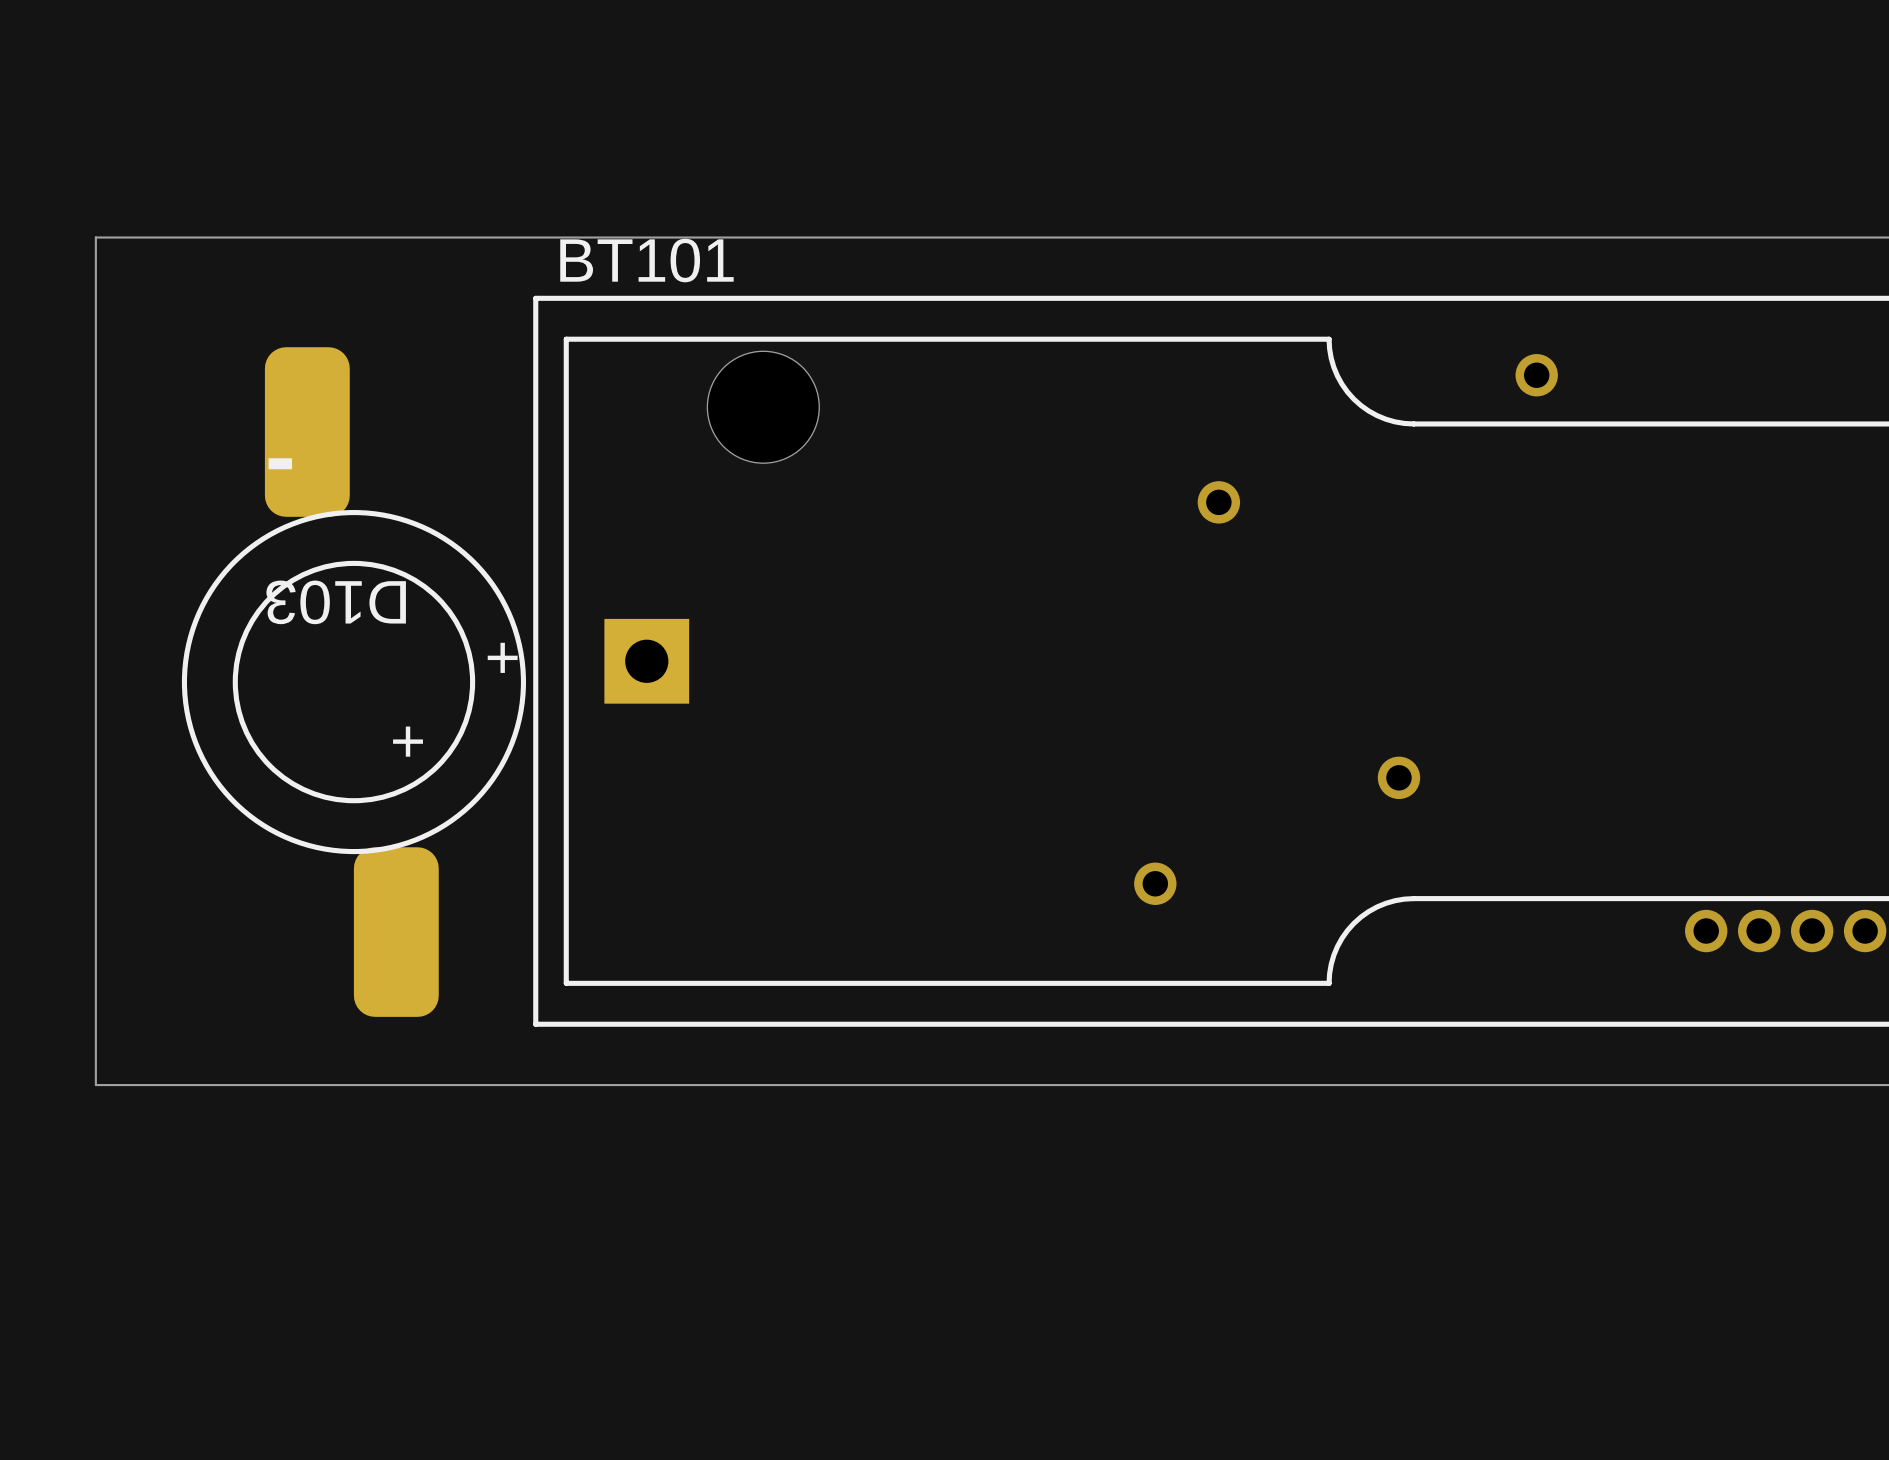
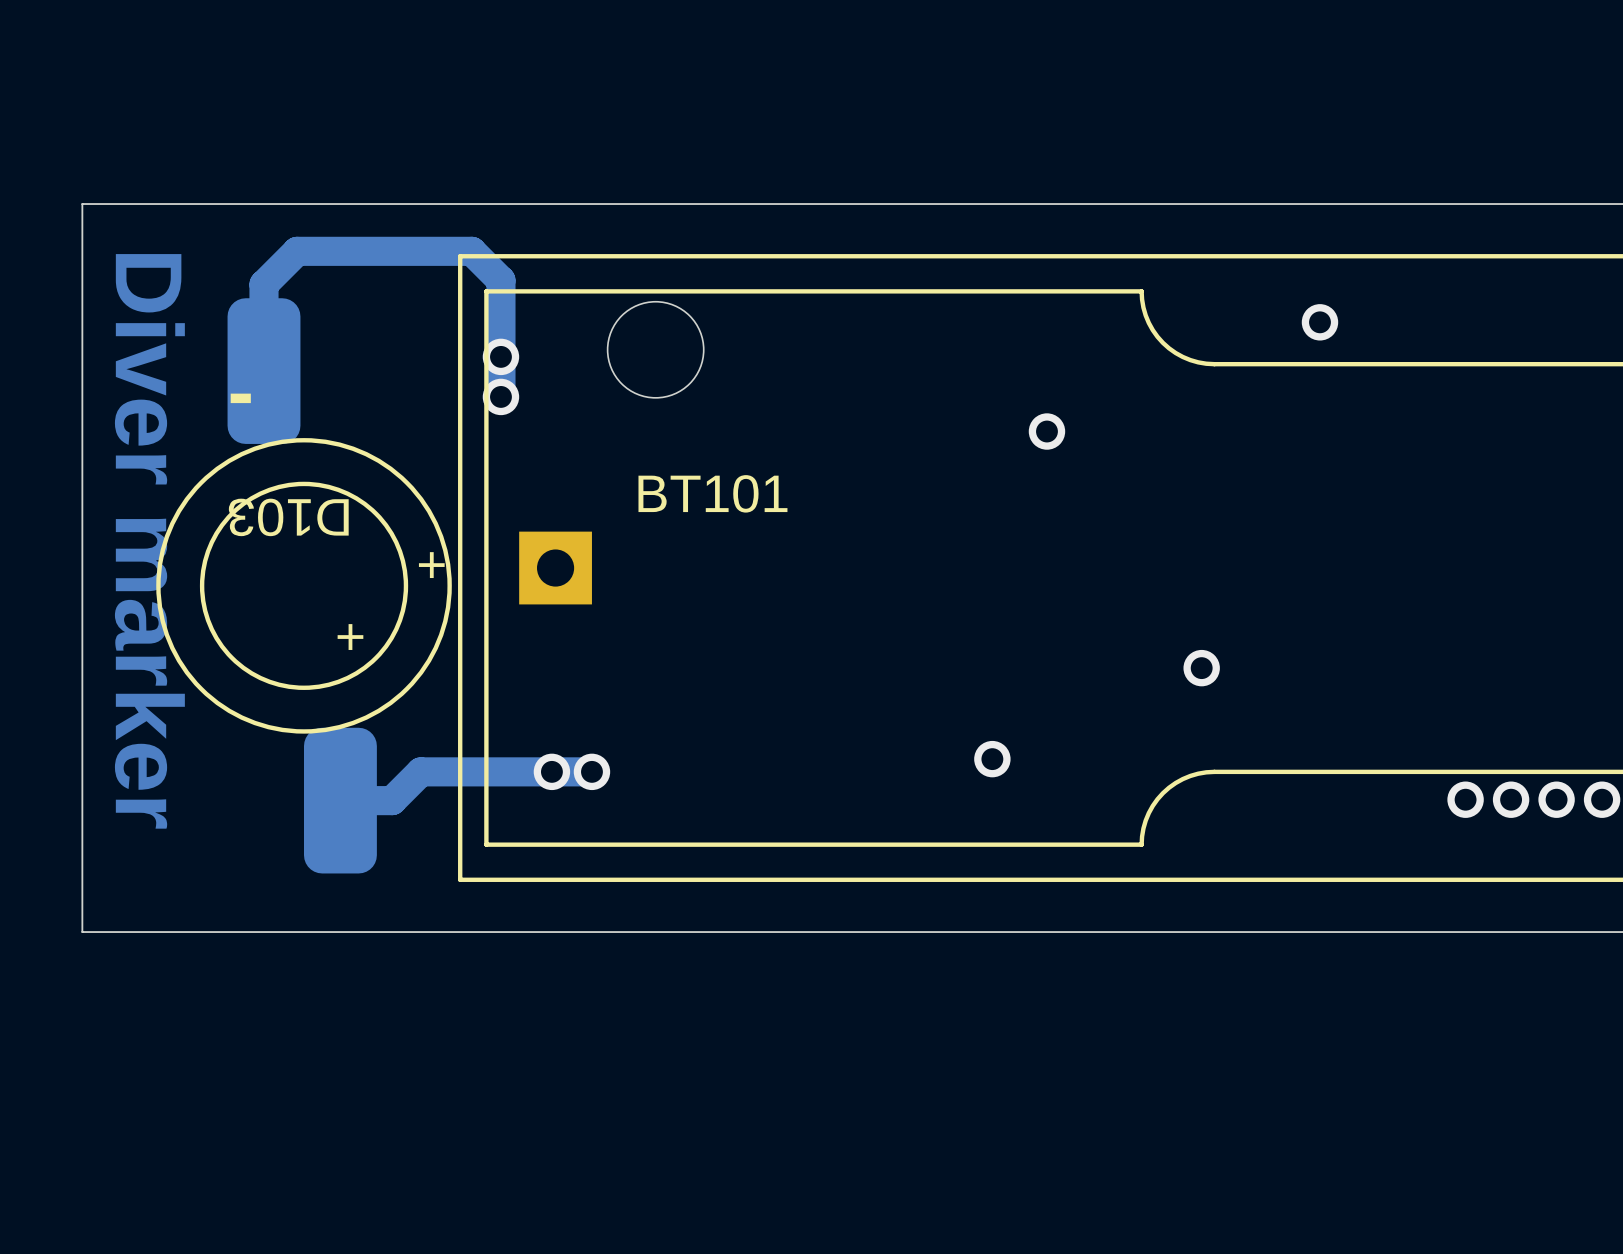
BT101 name position: BT101 (646, 260) -> BT101 (712, 493)
via: none -> (500, 356)
track: none -> (263, 371) (263, 284) (297, 251) (471, 251) (500, 280) (500, 396)
via: none -> (500, 396)
text: none -> Diver marker (149, 541)
via: none -> (551, 771)
track: none -> (591, 771) (420, 771) (392, 800) (340, 800)
via: none -> (591, 771)

